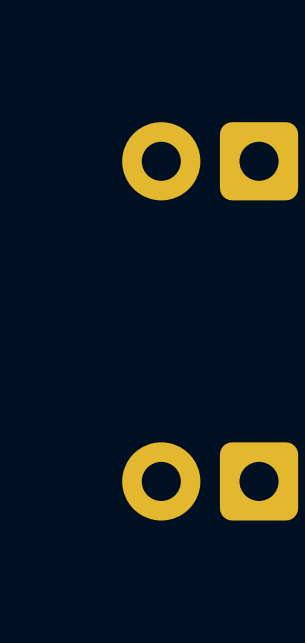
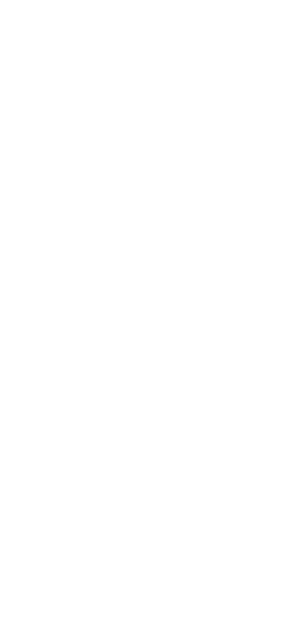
part: (210, 161) -> none
part: (210, 481) -> none

